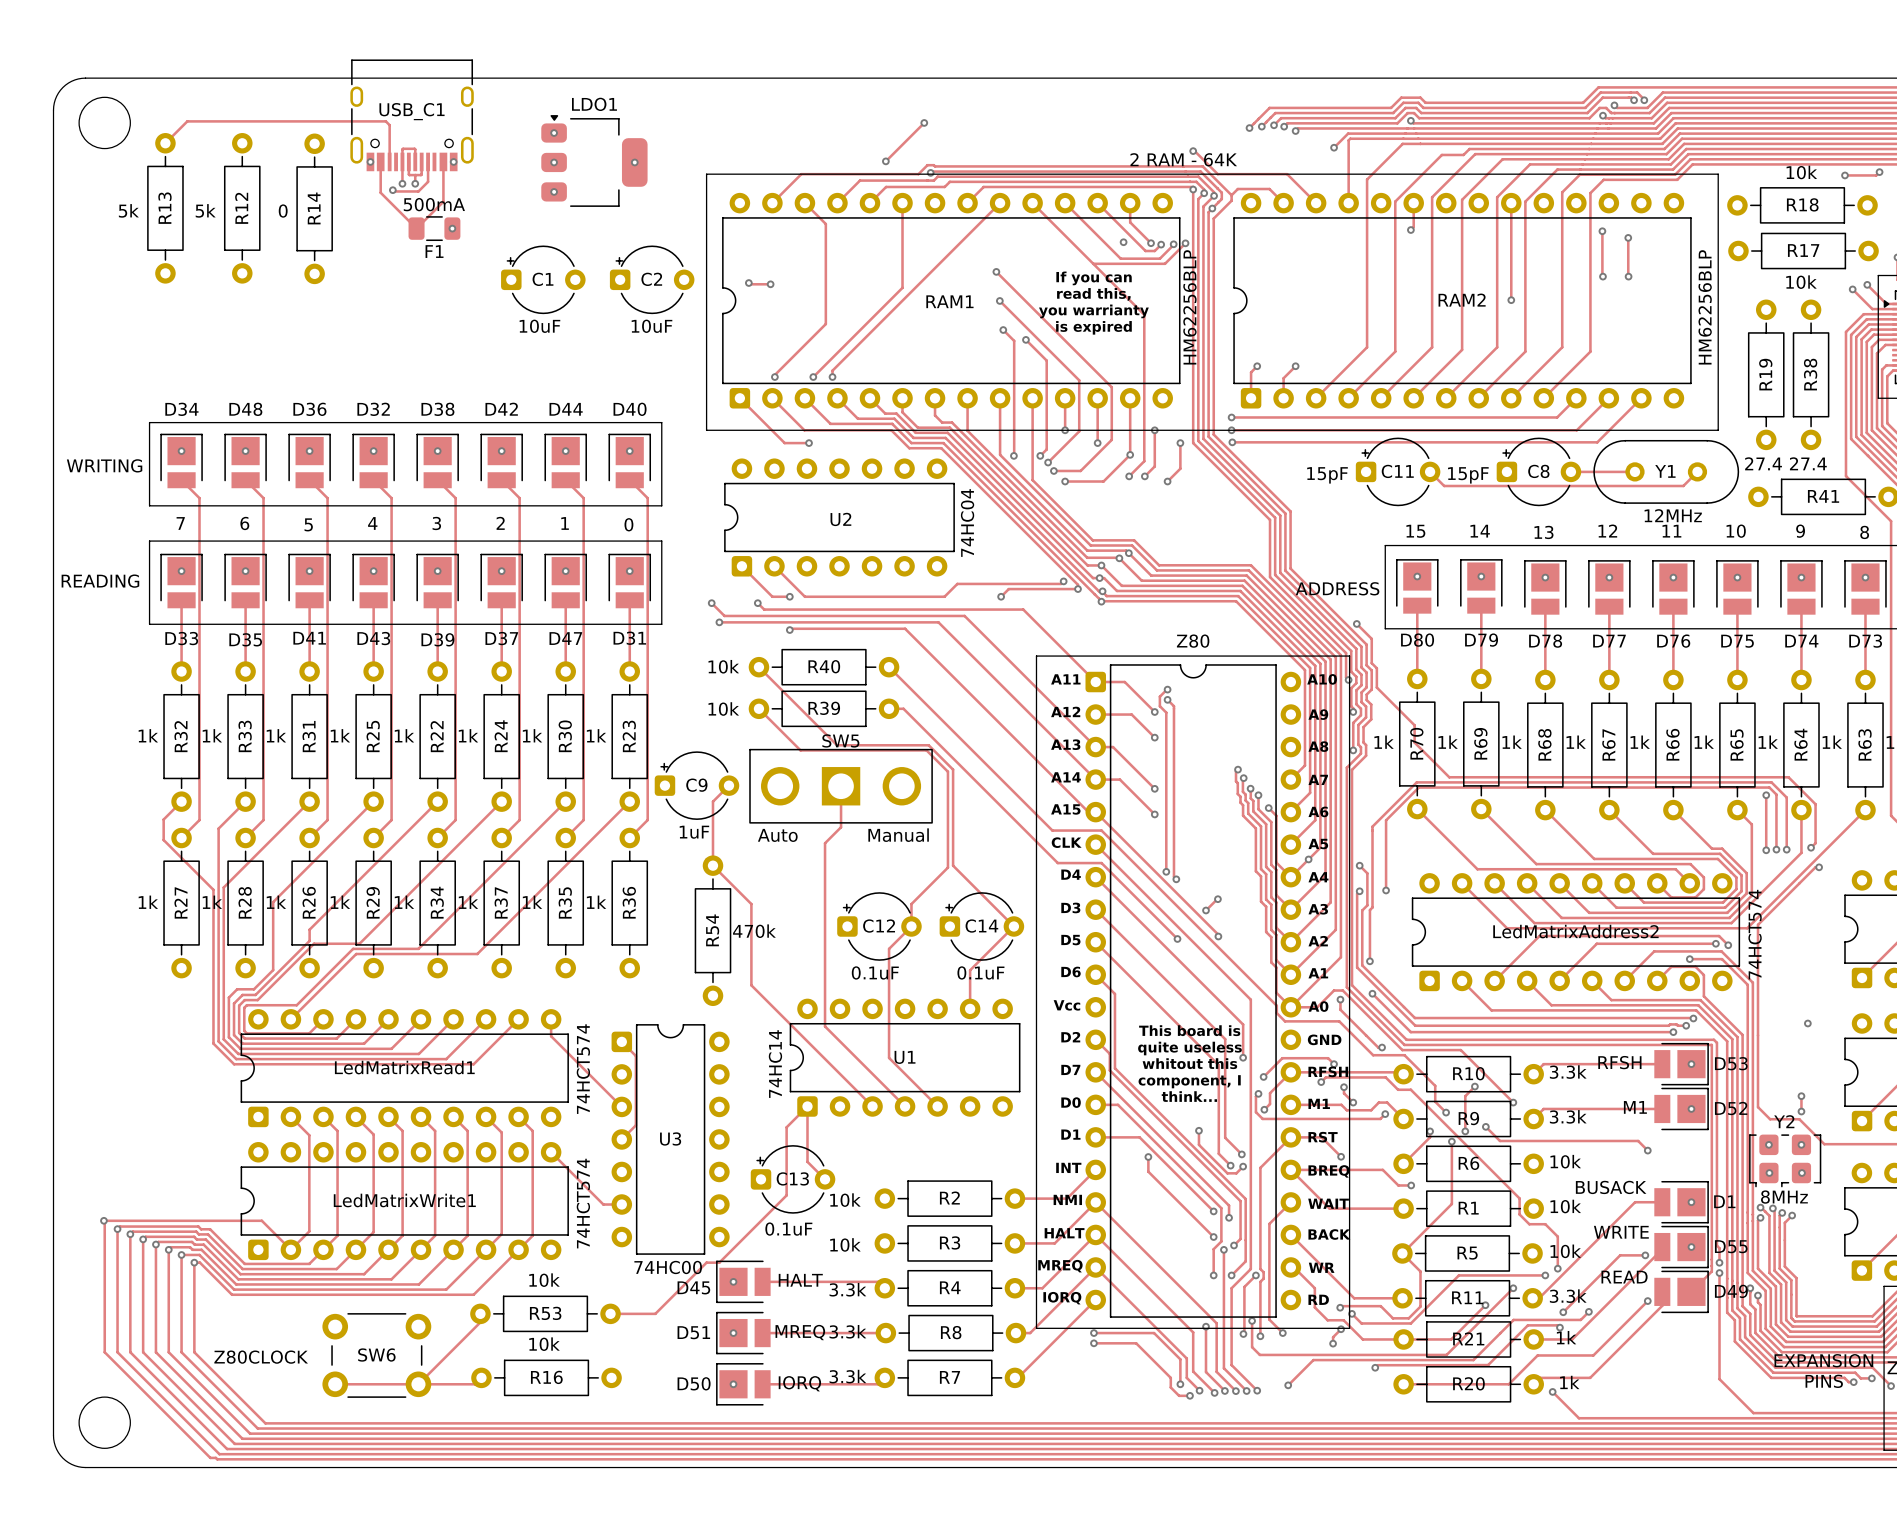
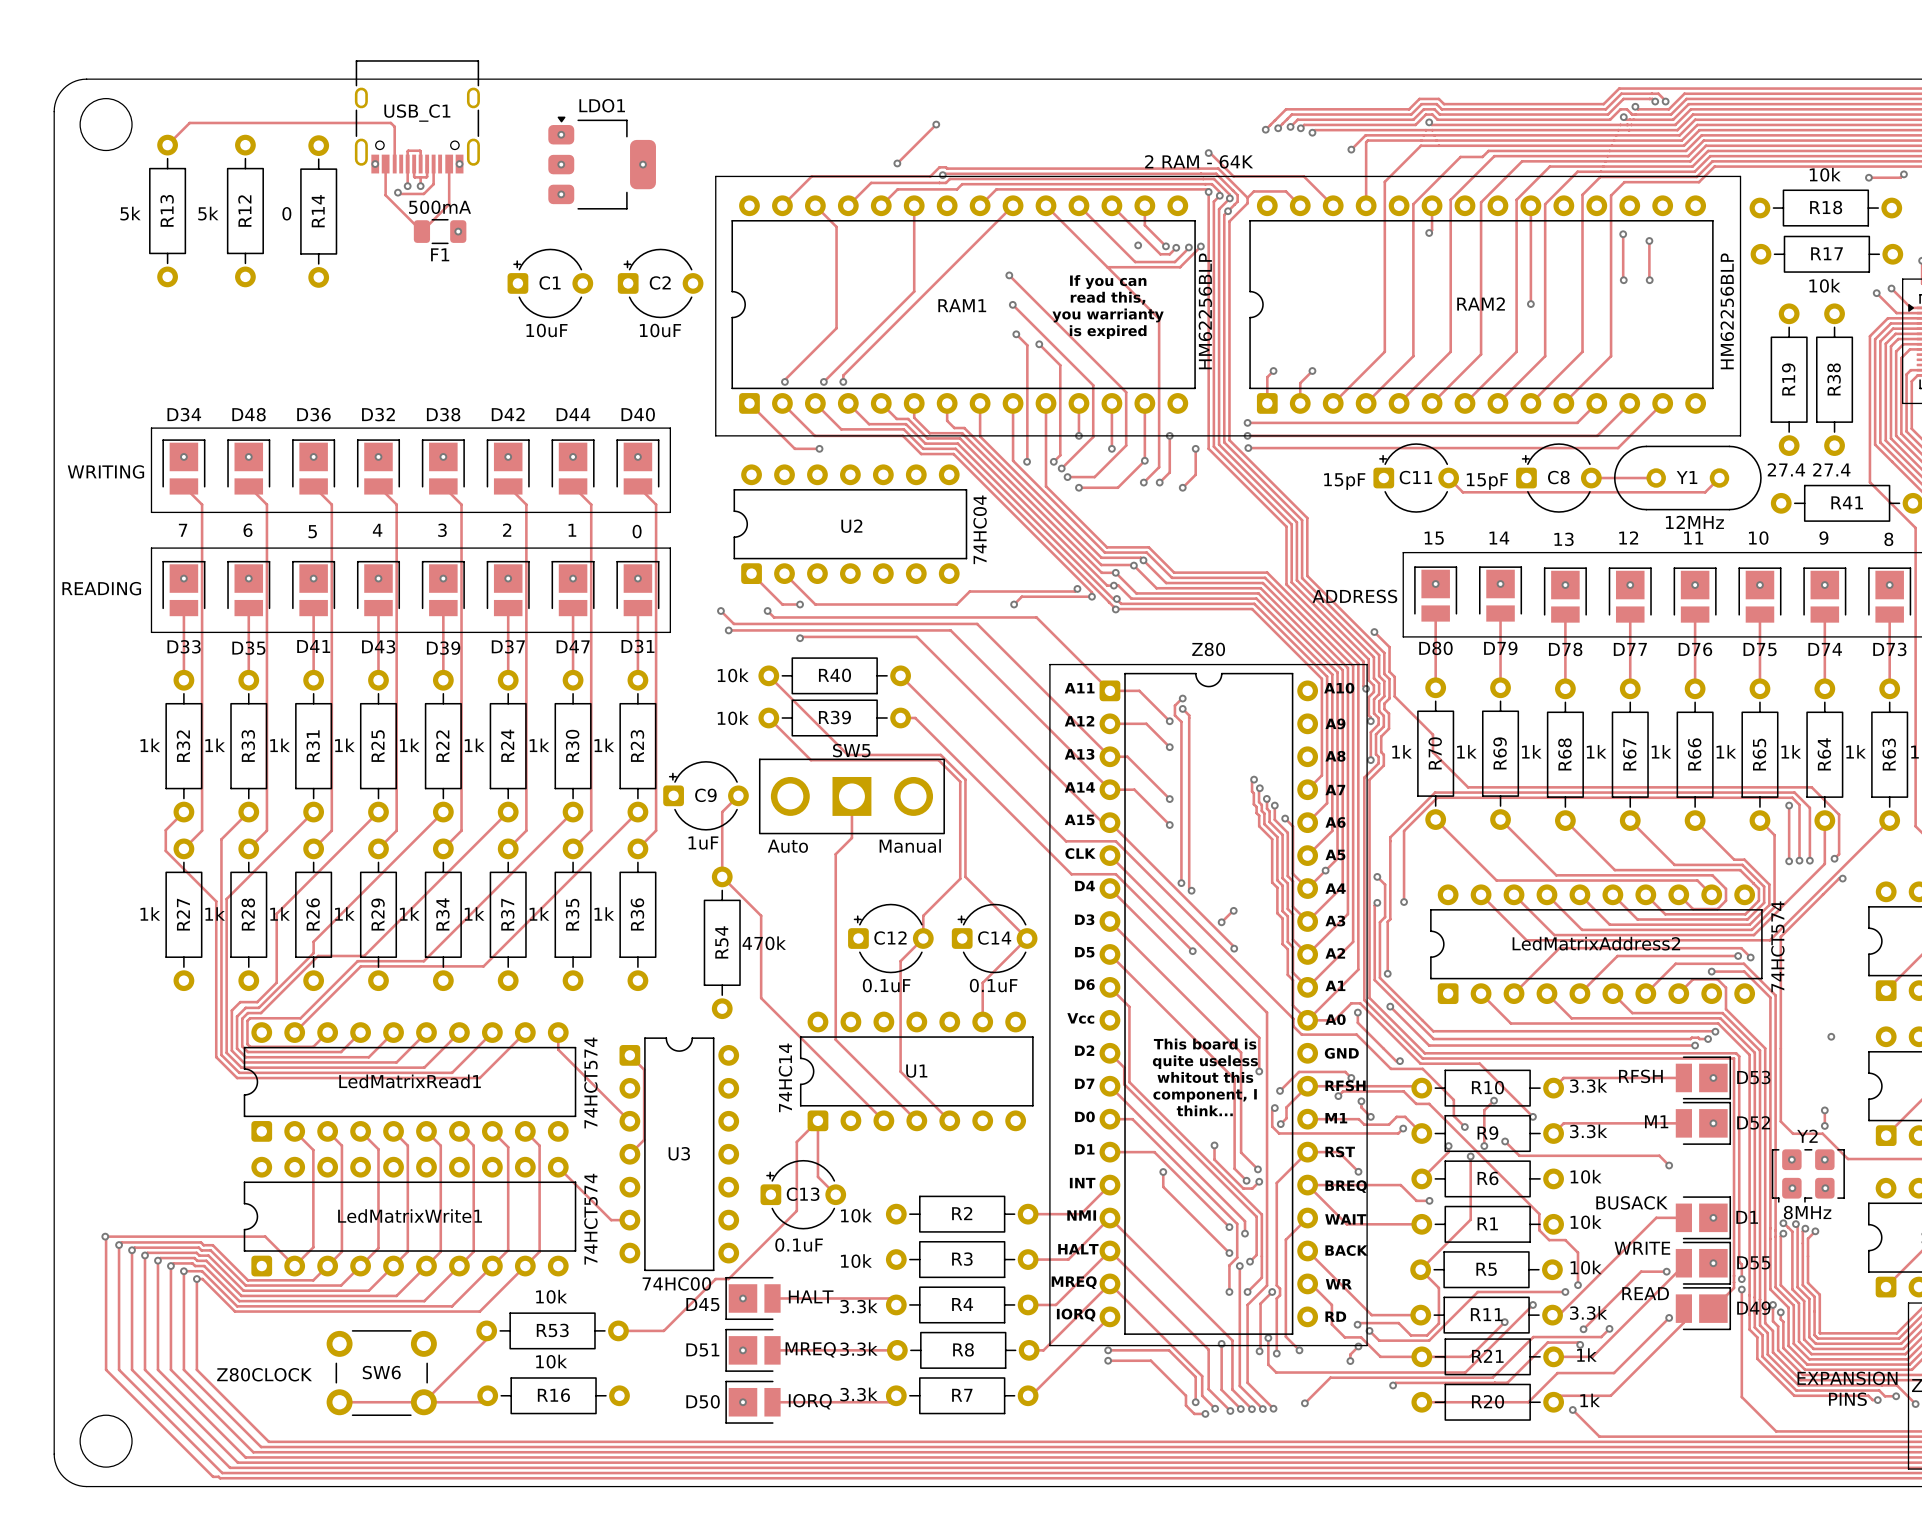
track: (748, 283) (770, 284) -> none
via: (748, 283) -> none
via: (770, 284) -> none

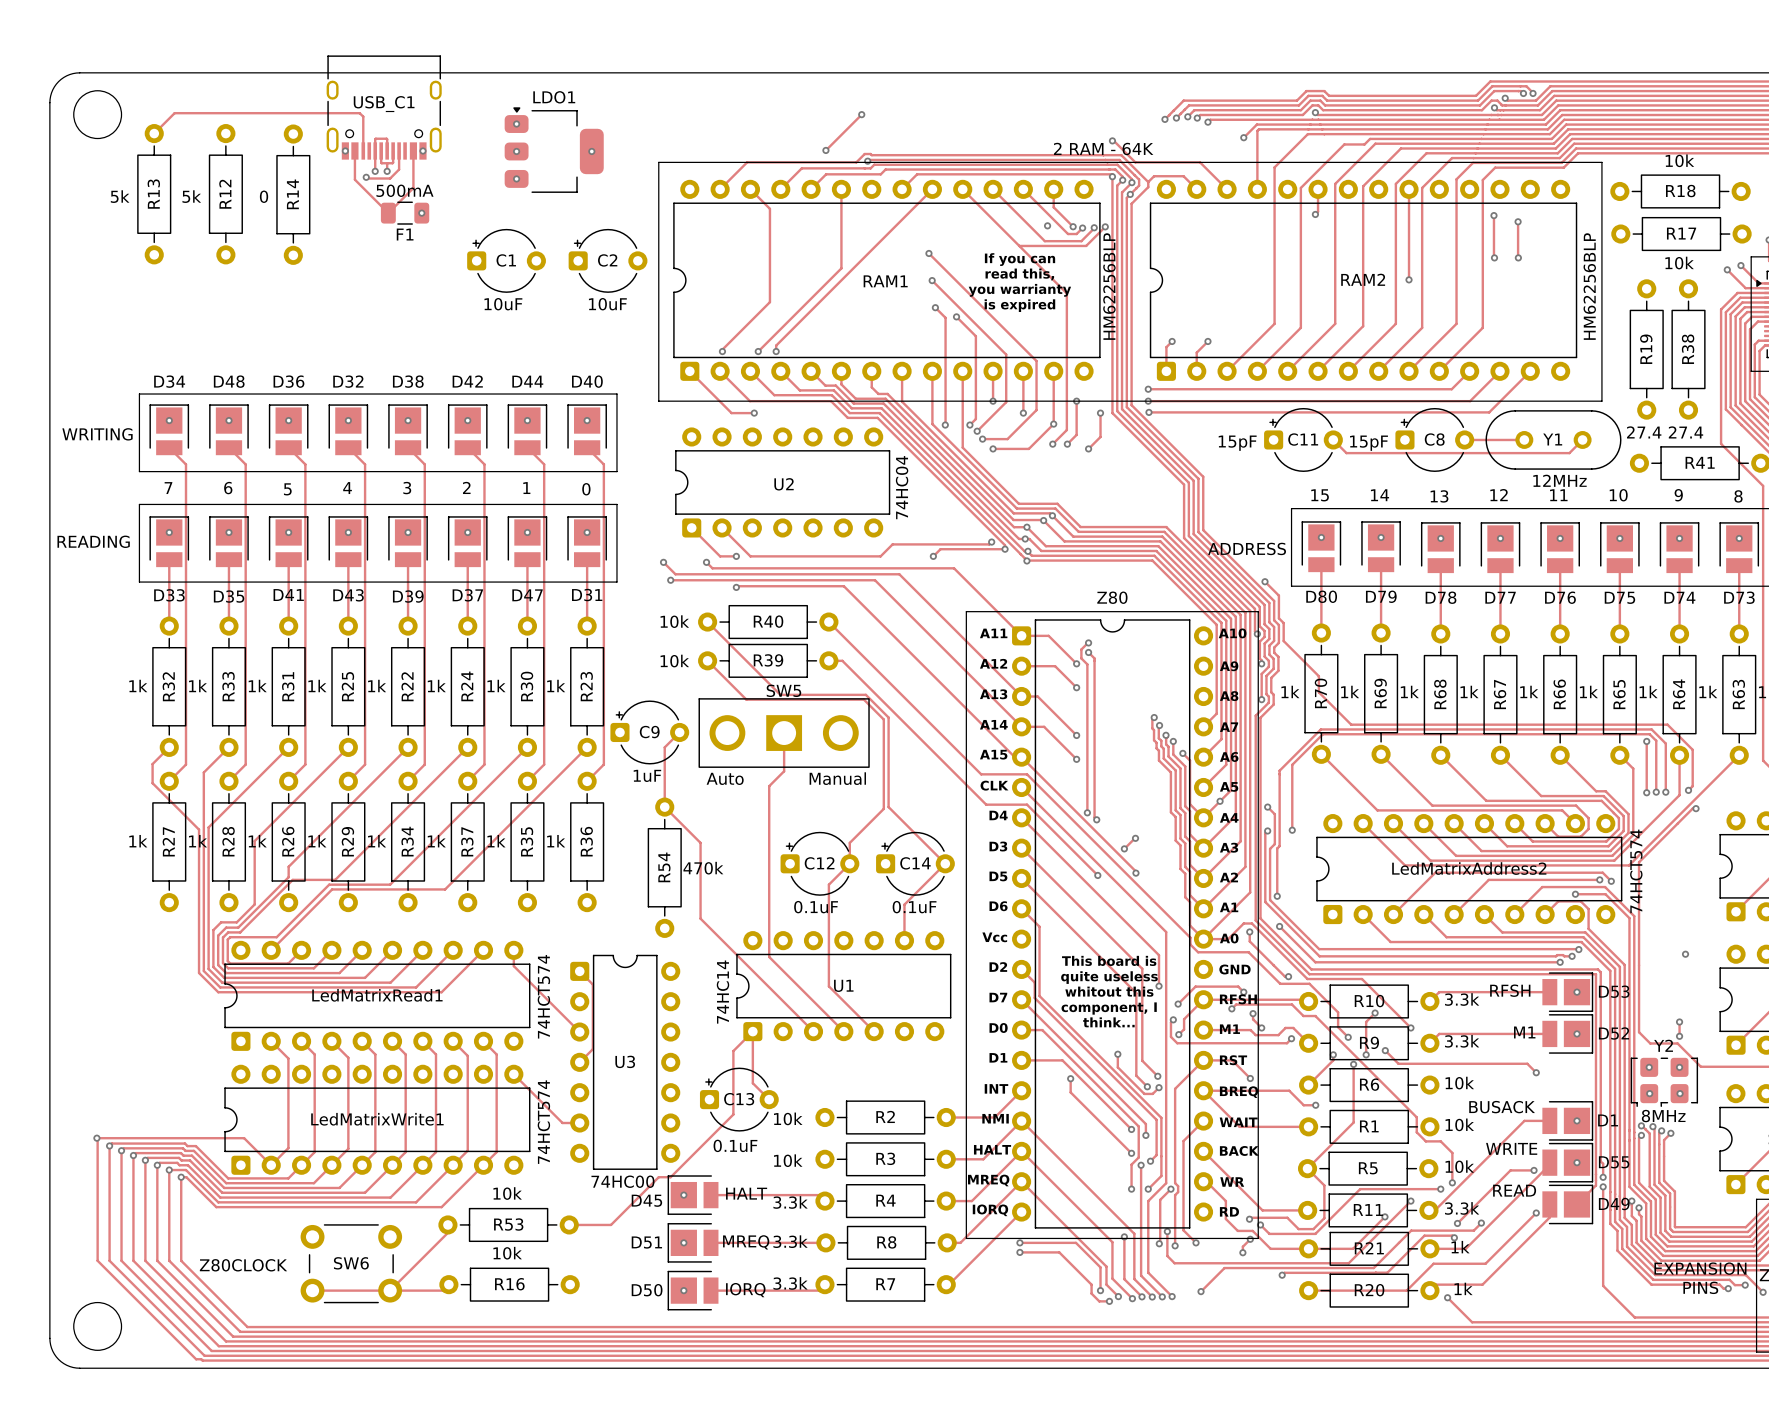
track: (1903, 174) (1900, 177) (1868, 177) -> none
via: (1903, 174) -> none
via: (1868, 177) -> none

